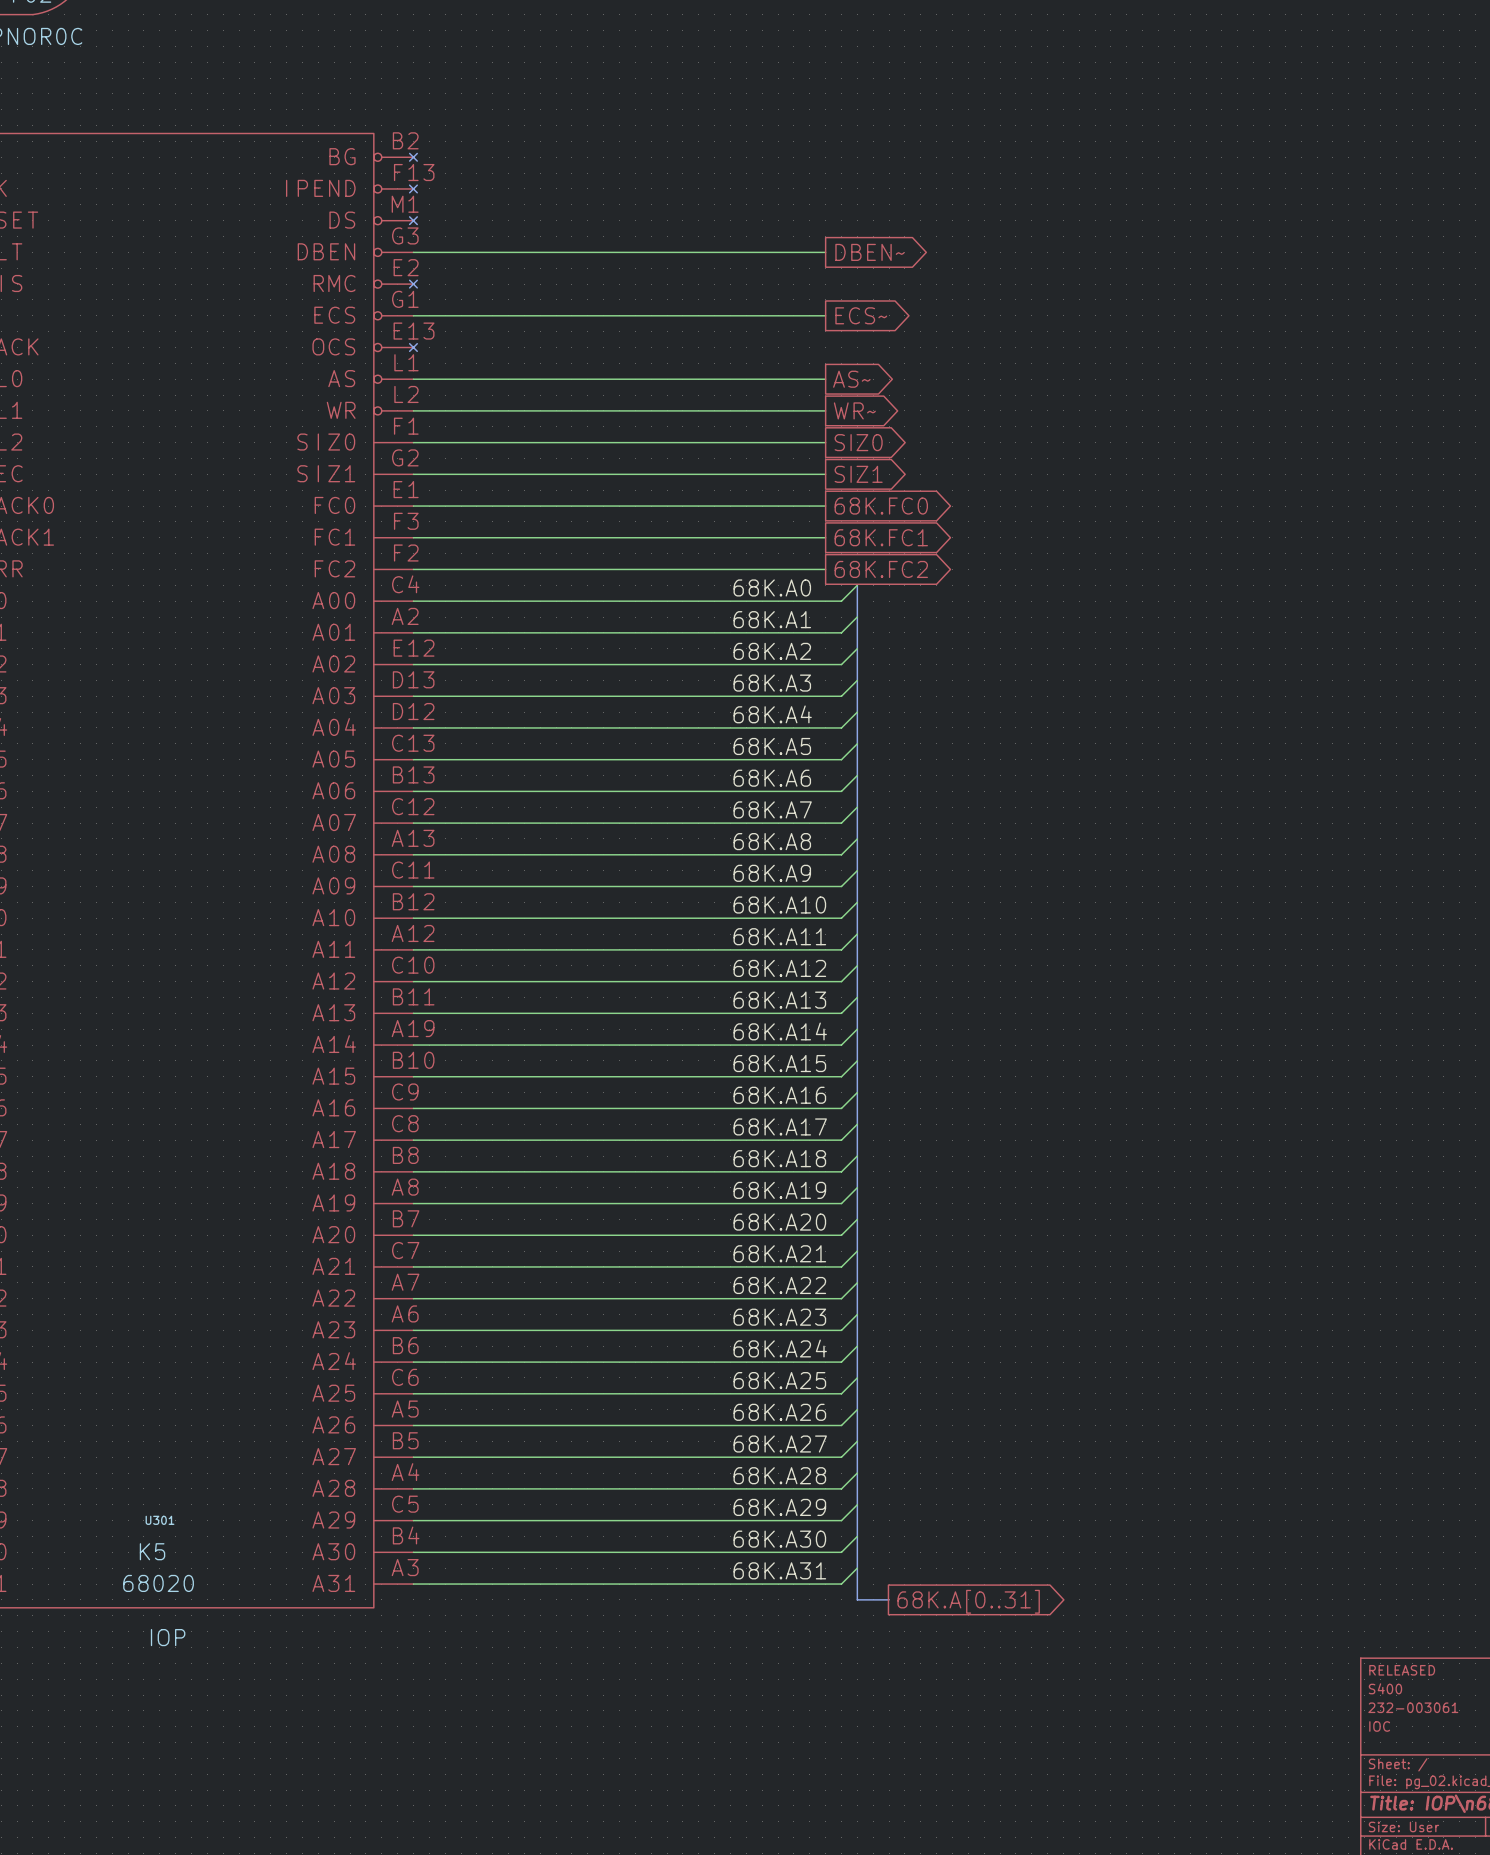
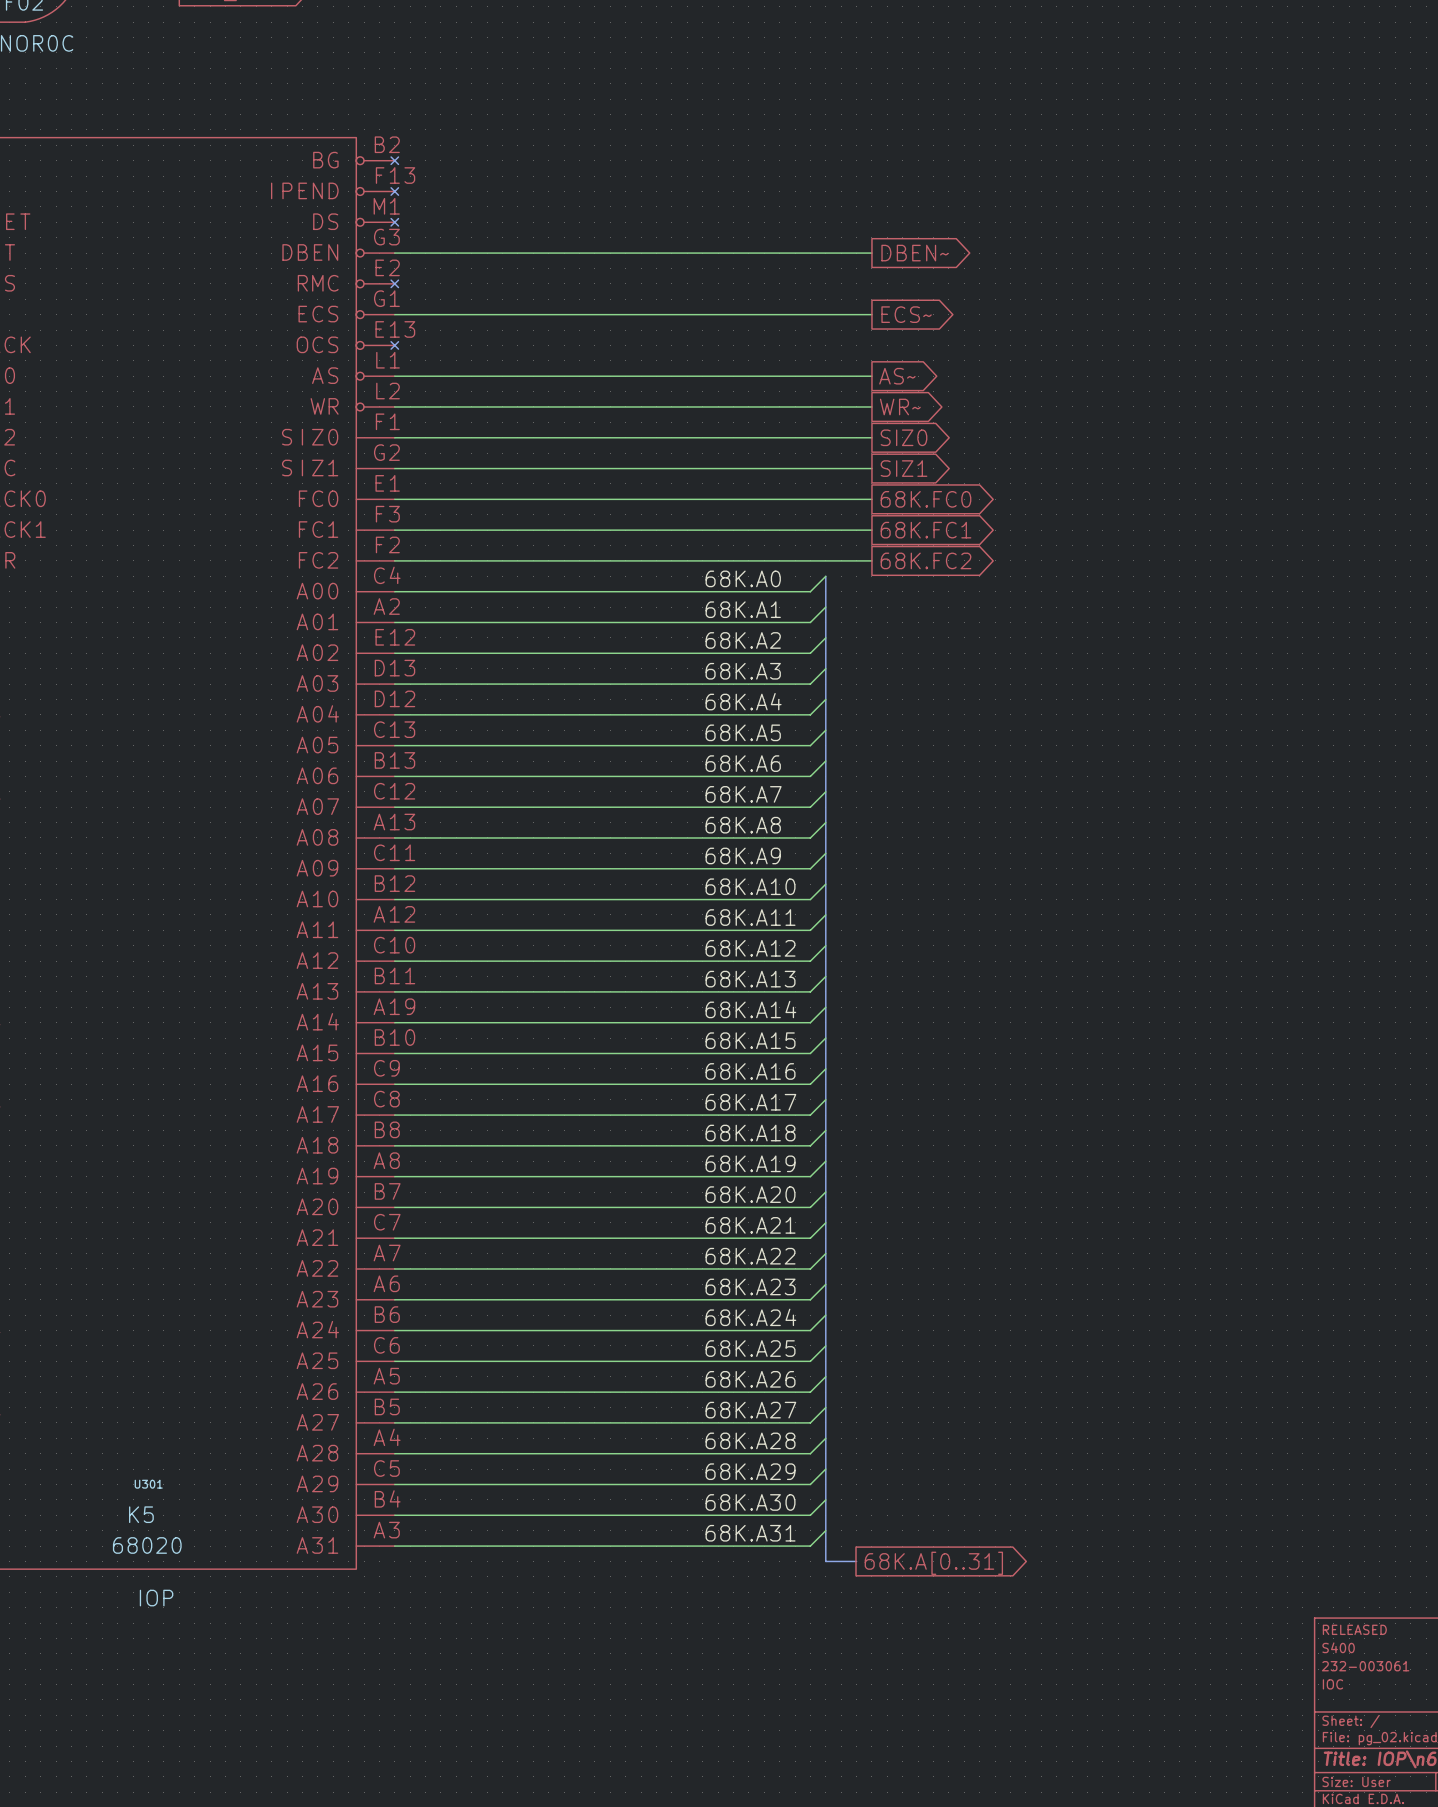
wire: none -> (795, 253) (871, 253)
global label position: DBEN~ (869, 252) -> DBEN~ (915, 253)
wire: none -> (795, 314) (871, 314)
global label position: ECS~ (861, 315) -> ECS~ (906, 314)
wire: none -> (795, 376) (871, 376)
global label position: AS~ (851, 379) -> AS~ (897, 376)
wire: none -> (795, 406) (871, 406)
global label position: WR~ (854, 410) -> WR~ (900, 406)
wire: none -> (795, 437) (871, 437)
global label position: SIZ0 (858, 442) -> SIZ0 (904, 437)
wire: none -> (795, 468) (871, 468)
global label position: SIZ1 (858, 474) -> SIZ1 (904, 468)
wire: none -> (795, 499) (871, 499)
global label position: 68K.FC0 (881, 506) -> 68K.FC0 (925, 499)
wire: none -> (795, 530) (871, 530)
global label position: 68K.FC1 (881, 537) -> 68K.FC1 (925, 530)
wire: none -> (795, 560) (871, 560)
global label position: 68K.FC2 (881, 569) -> 68K.FC2 (925, 560)

